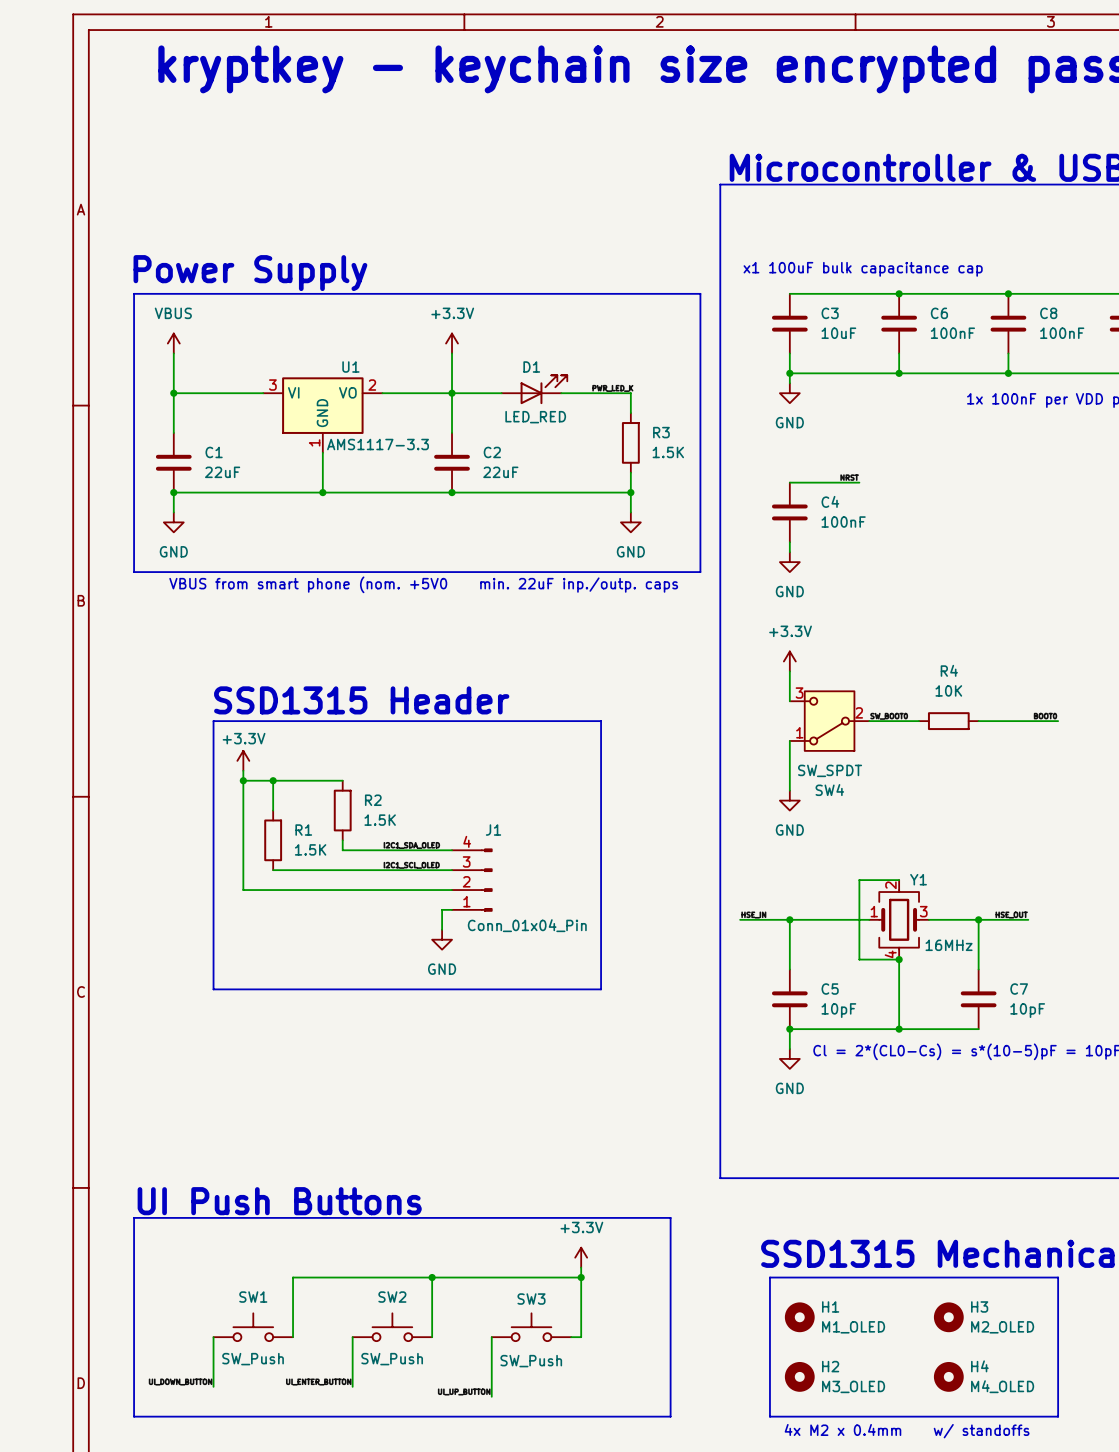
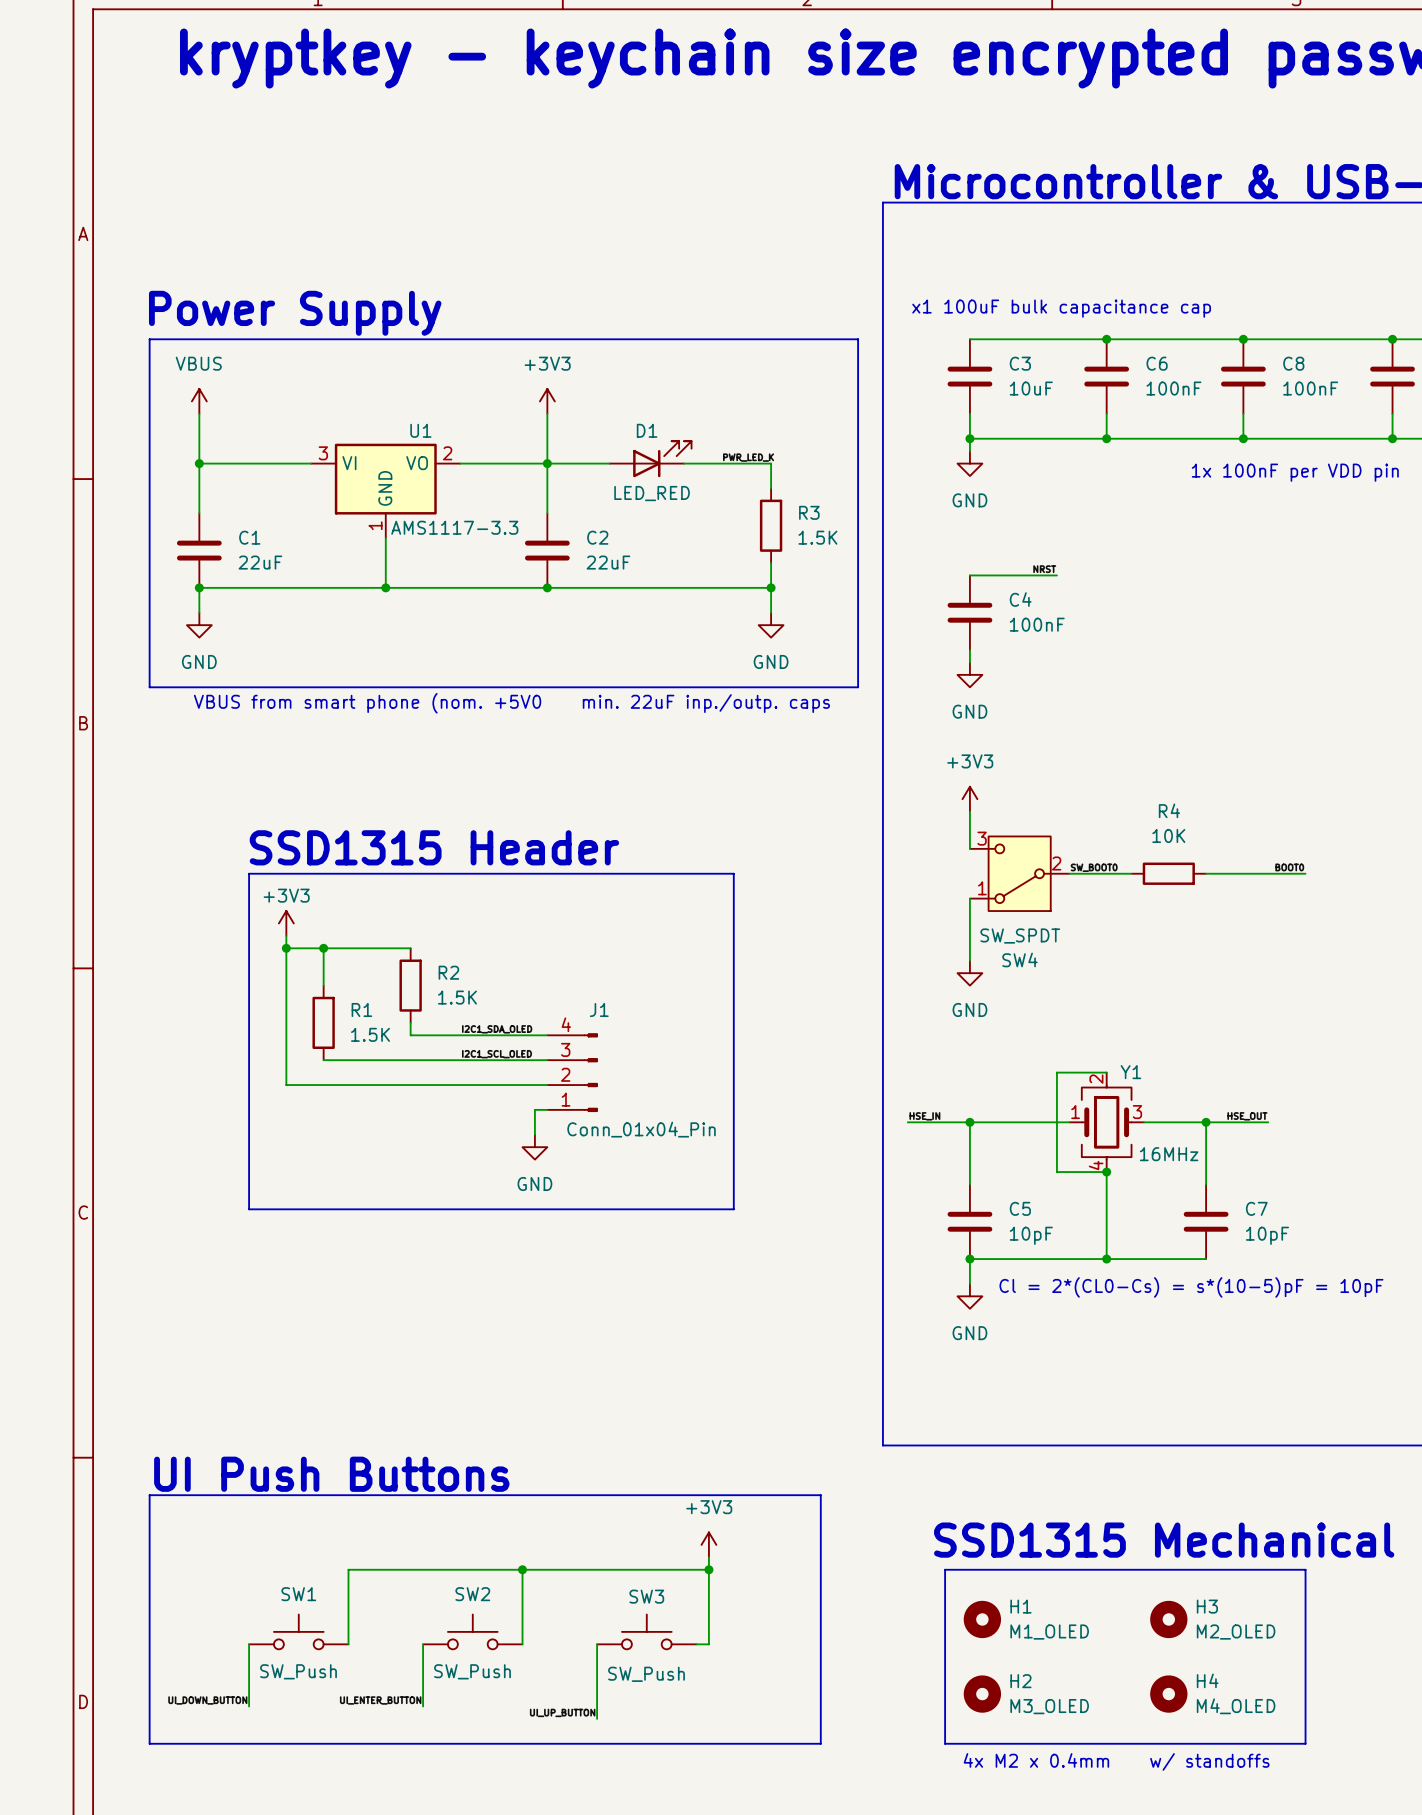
power symbol: +3.3V (452, 343) -> +3V3 (547, 401)
power symbol: +3.3V (789, 661) -> +3V3 (969, 799)
power symbol: +3.3V (243, 760) -> +3V3 (286, 923)
power symbol: +3.3V (581, 1257) -> +3V3 (708, 1544)

